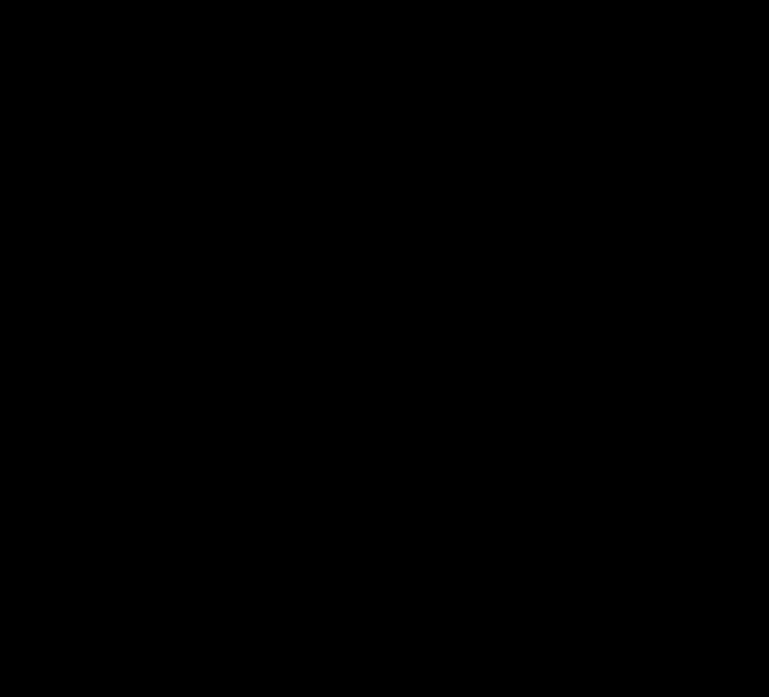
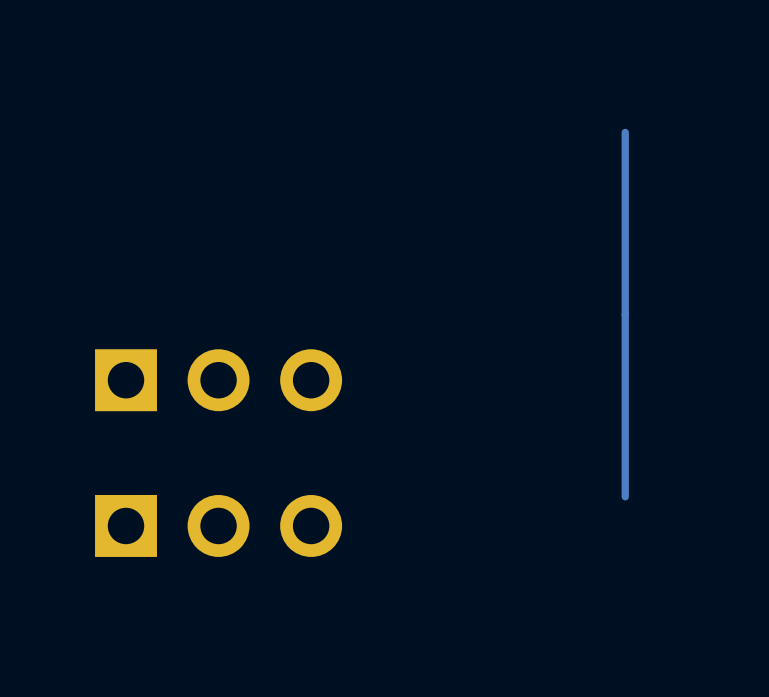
track: none -> (625, 132) (625, 496)
part: none -> (218, 380)
part: none -> (218, 525)

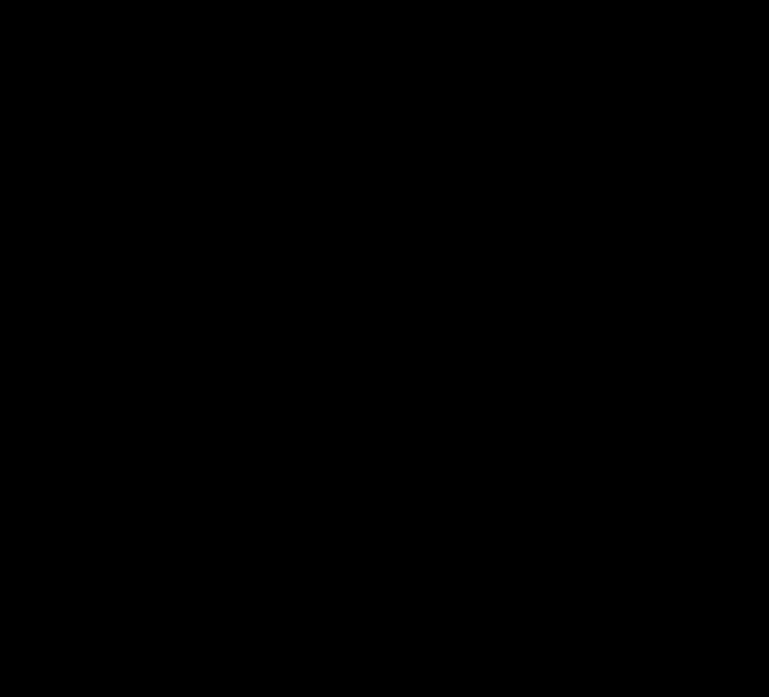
track: (625, 132) (625, 496) -> none
part: (218, 380) -> none
part: (218, 525) -> none

